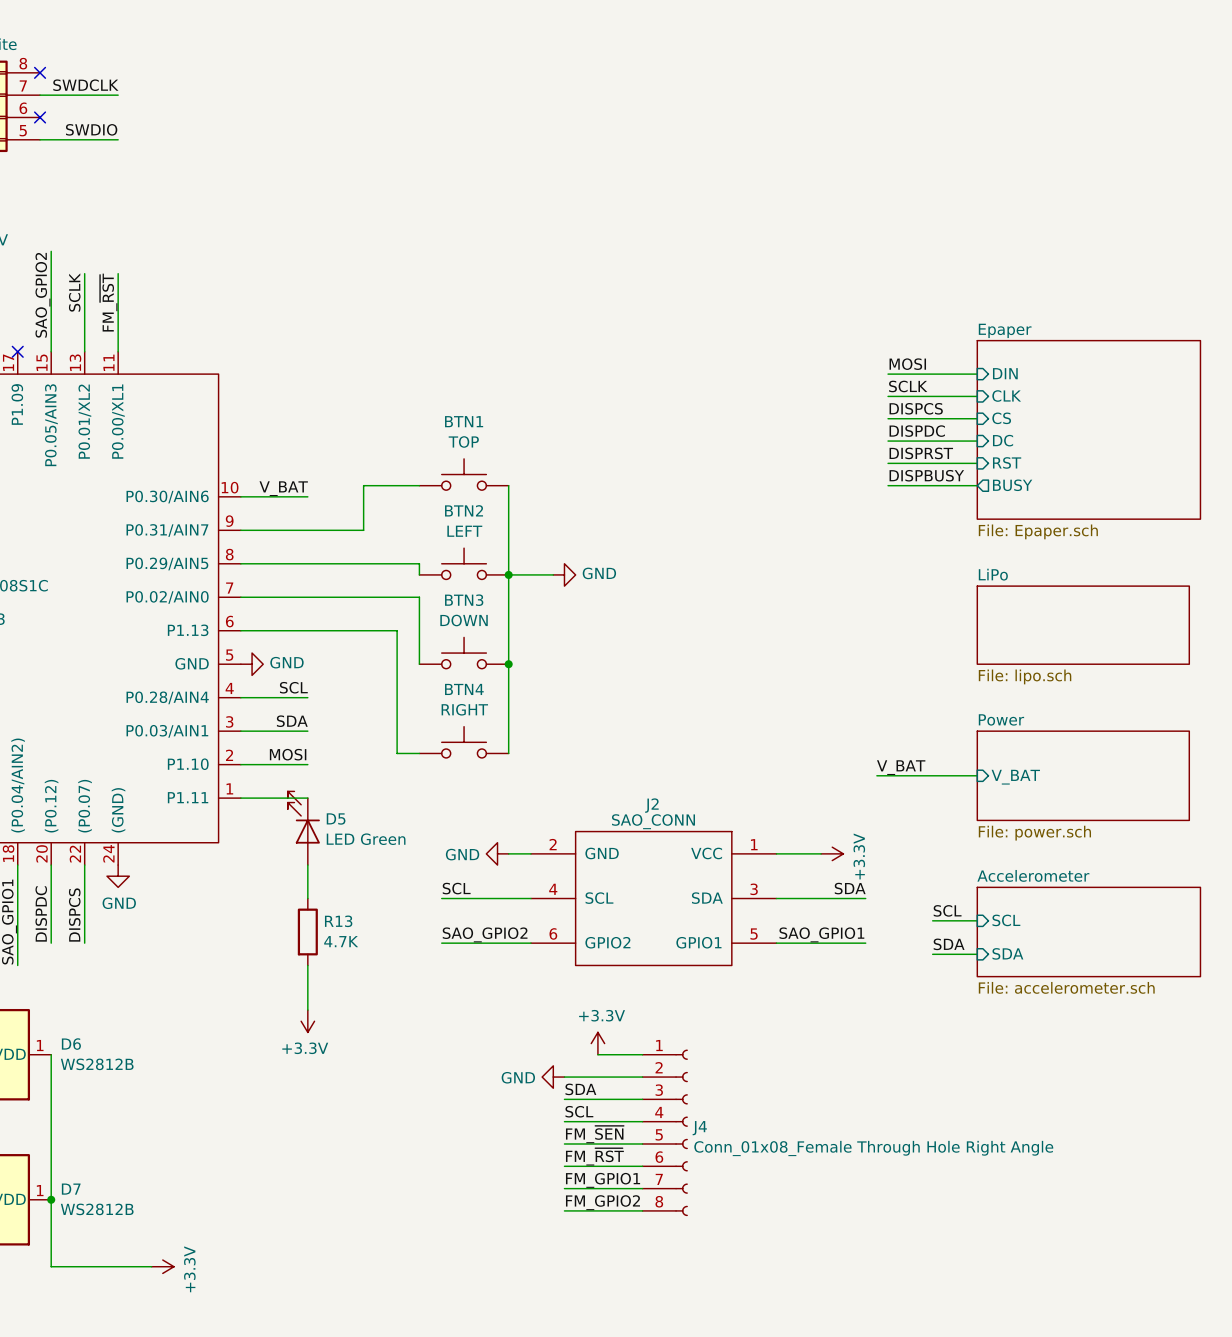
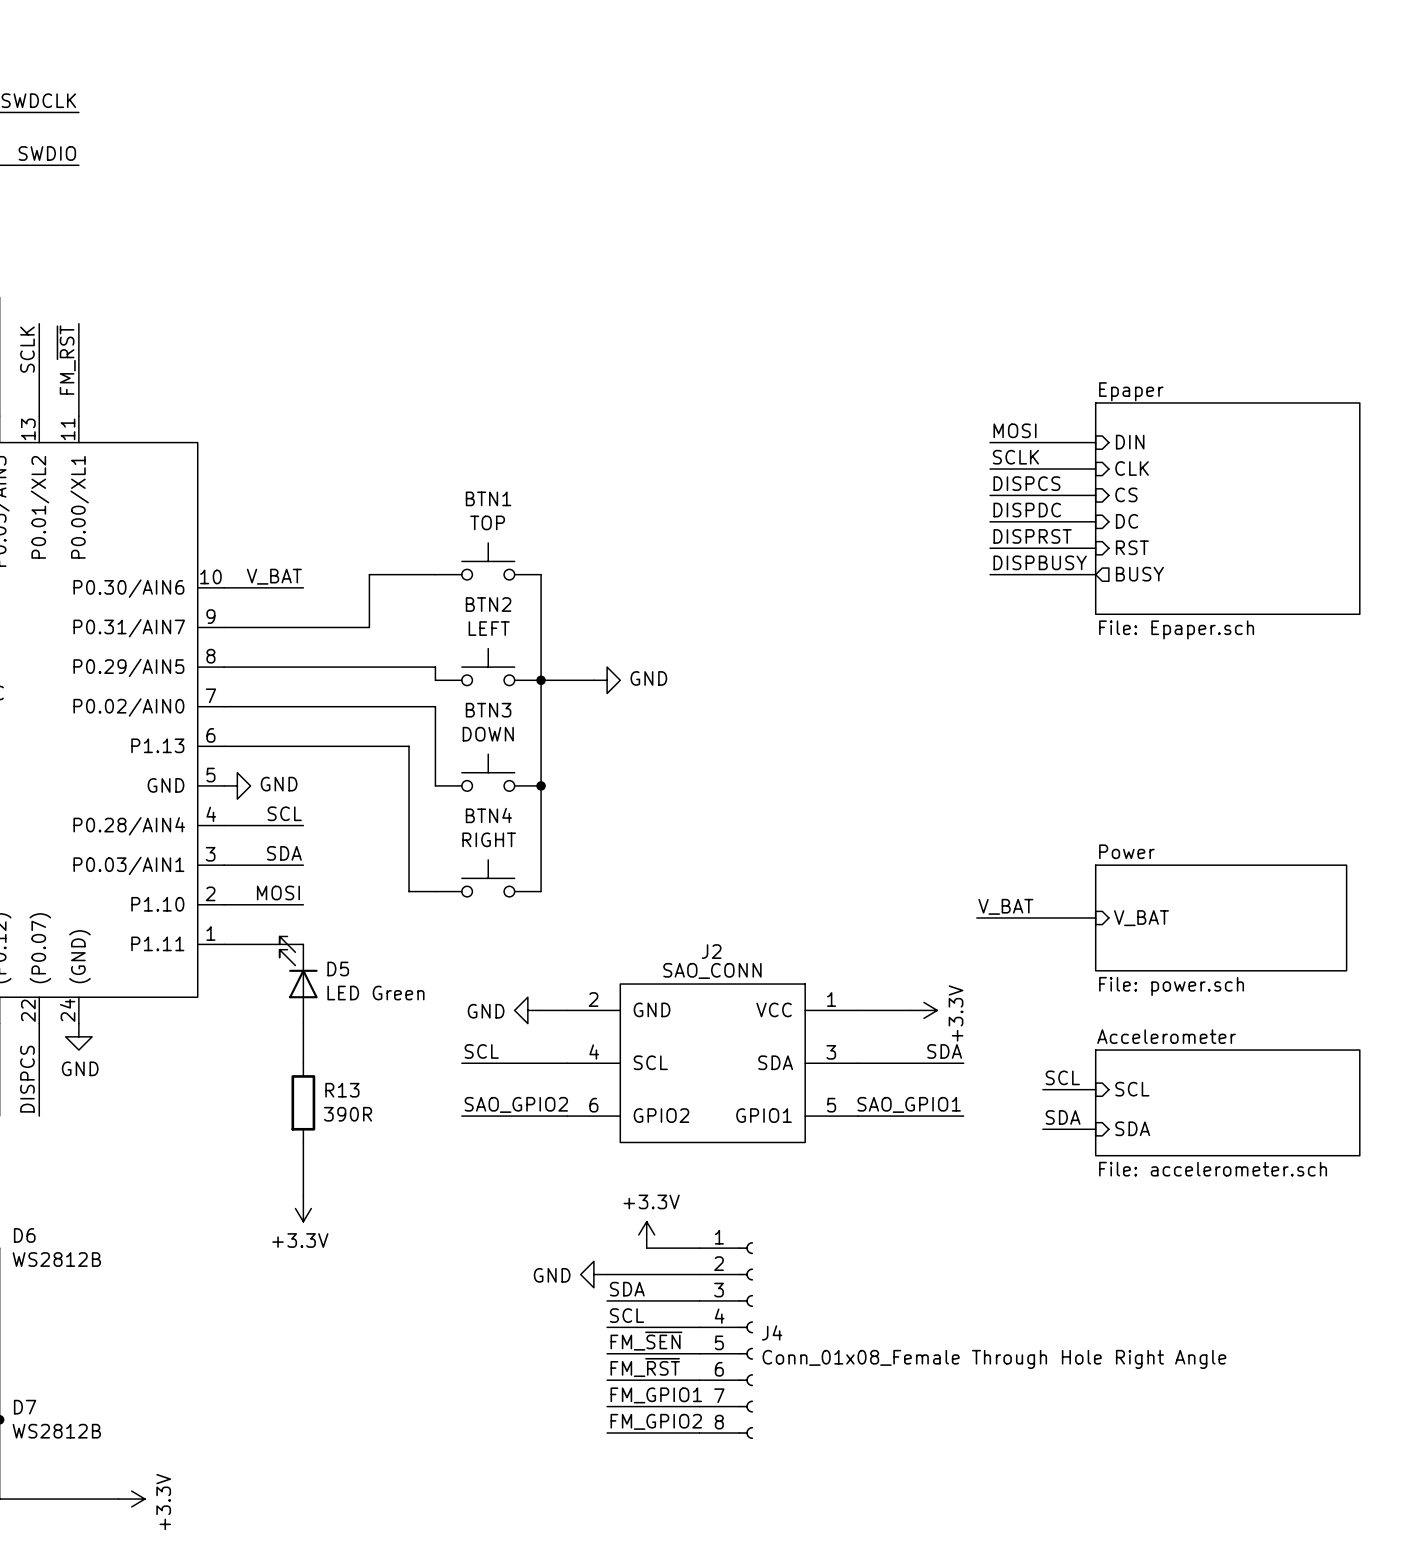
sheet LiPo: File: lipo.sch (1083, 625) -> none
R13 value: 4.7K (341, 941) -> 390R (348, 1114)

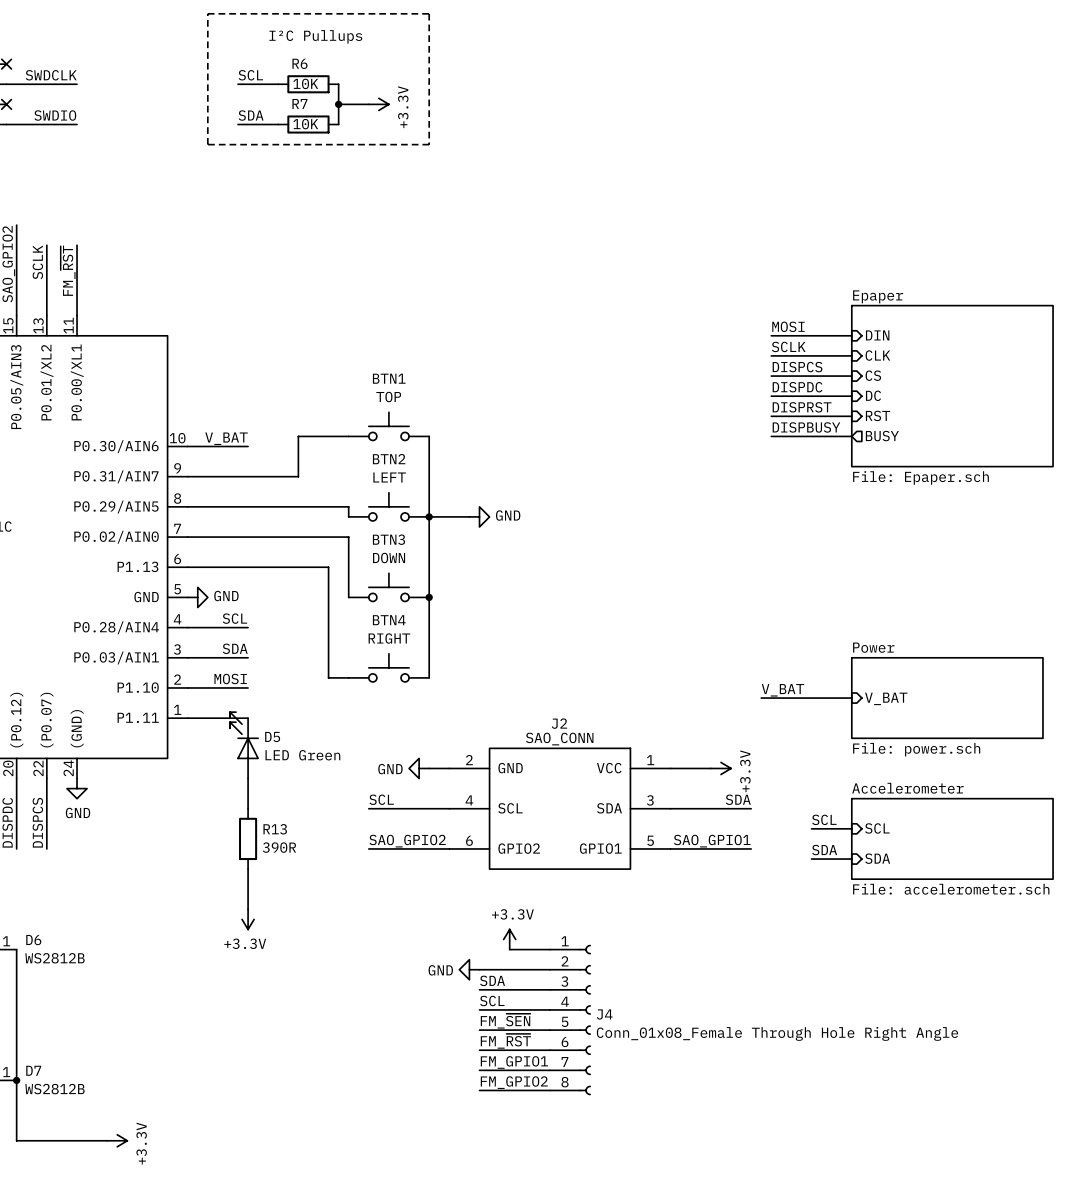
line: none -> (207, 13) (429, 13) (429, 144) (207, 144) (207, 13)
text: none -> I²C Pullups (315, 36)
label: none -> SCL (250, 75)
wire: none -> (238, 84) (278, 84)
R6: none -> 10K (308, 84)
wire: none -> (338, 84) (338, 124)
wire: none -> (338, 104) (368, 104)
junction: none -> (338, 104)
power symbol: none -> +3.3V (378, 104)
label: none -> SDA (251, 115)
wire: none -> (238, 124) (278, 124)
R7: none -> 10K (308, 124)

